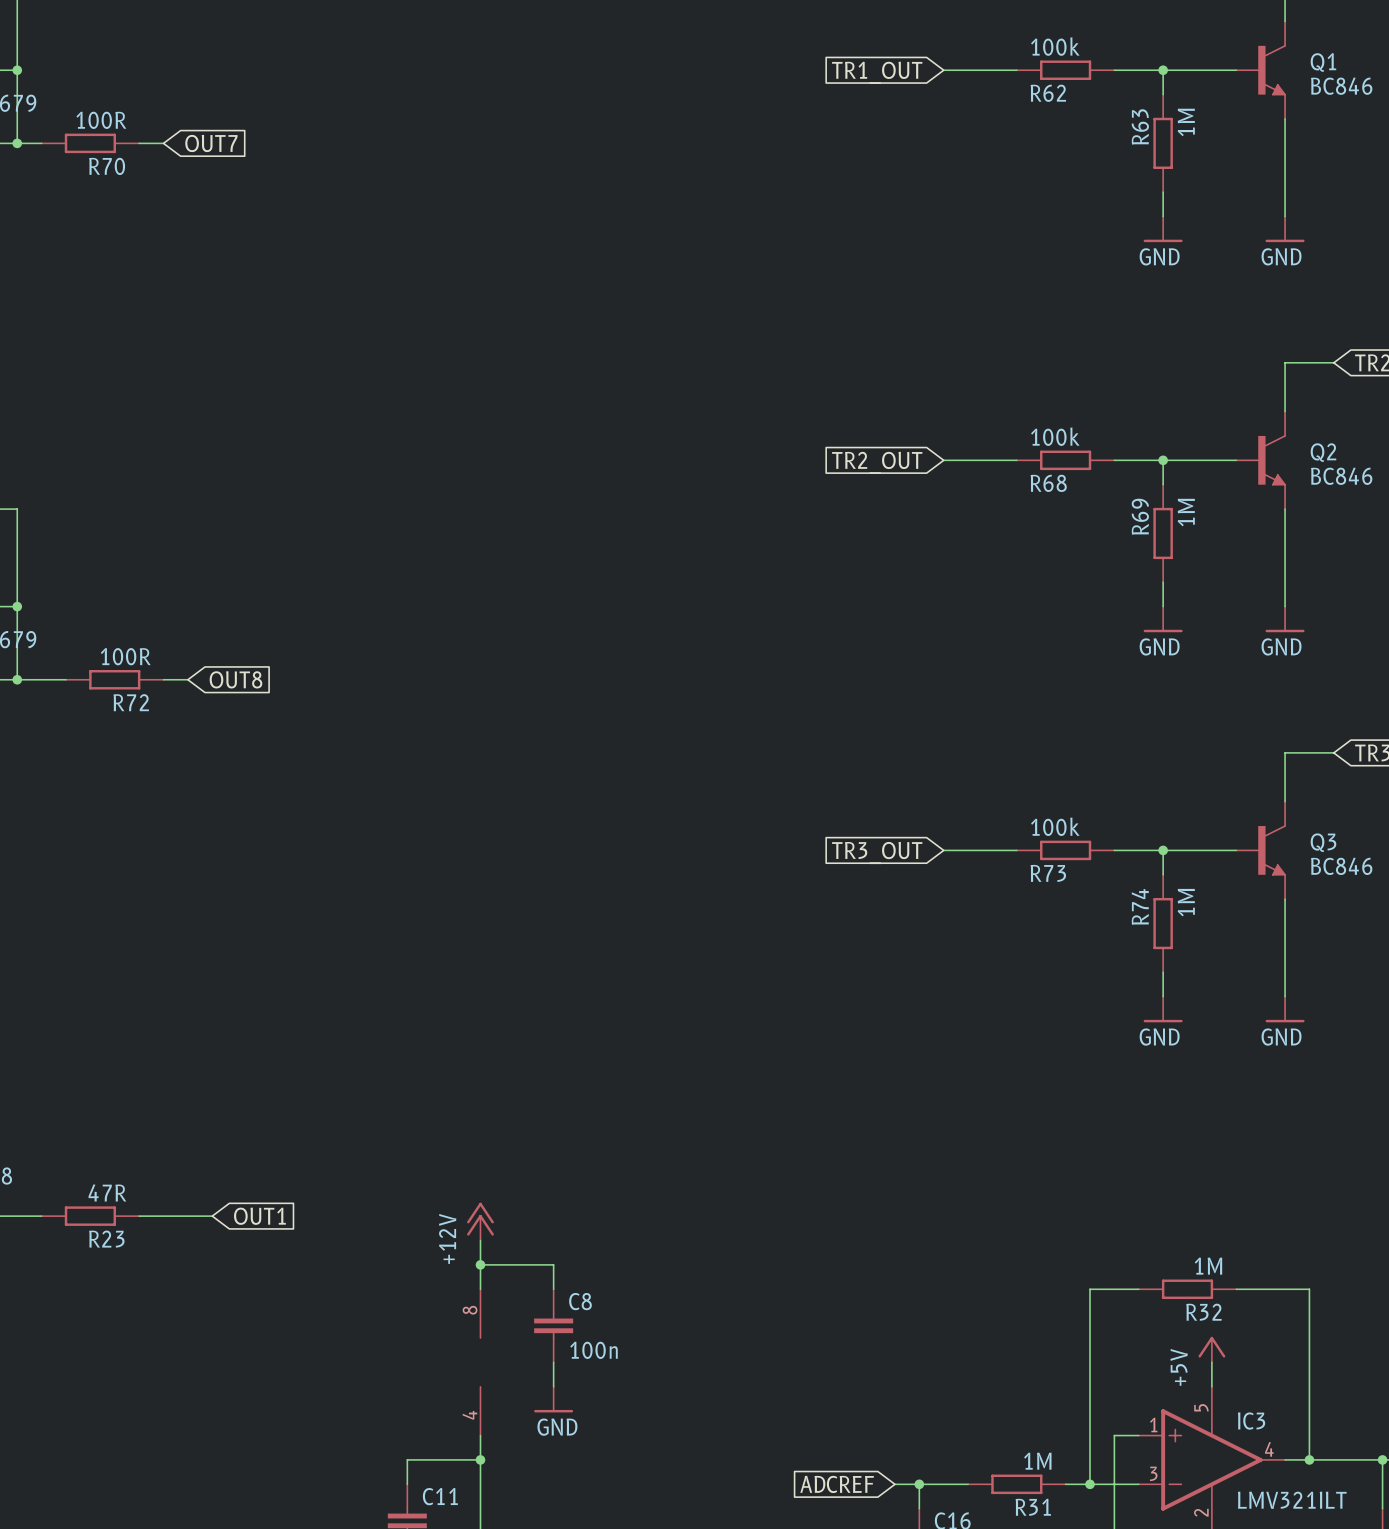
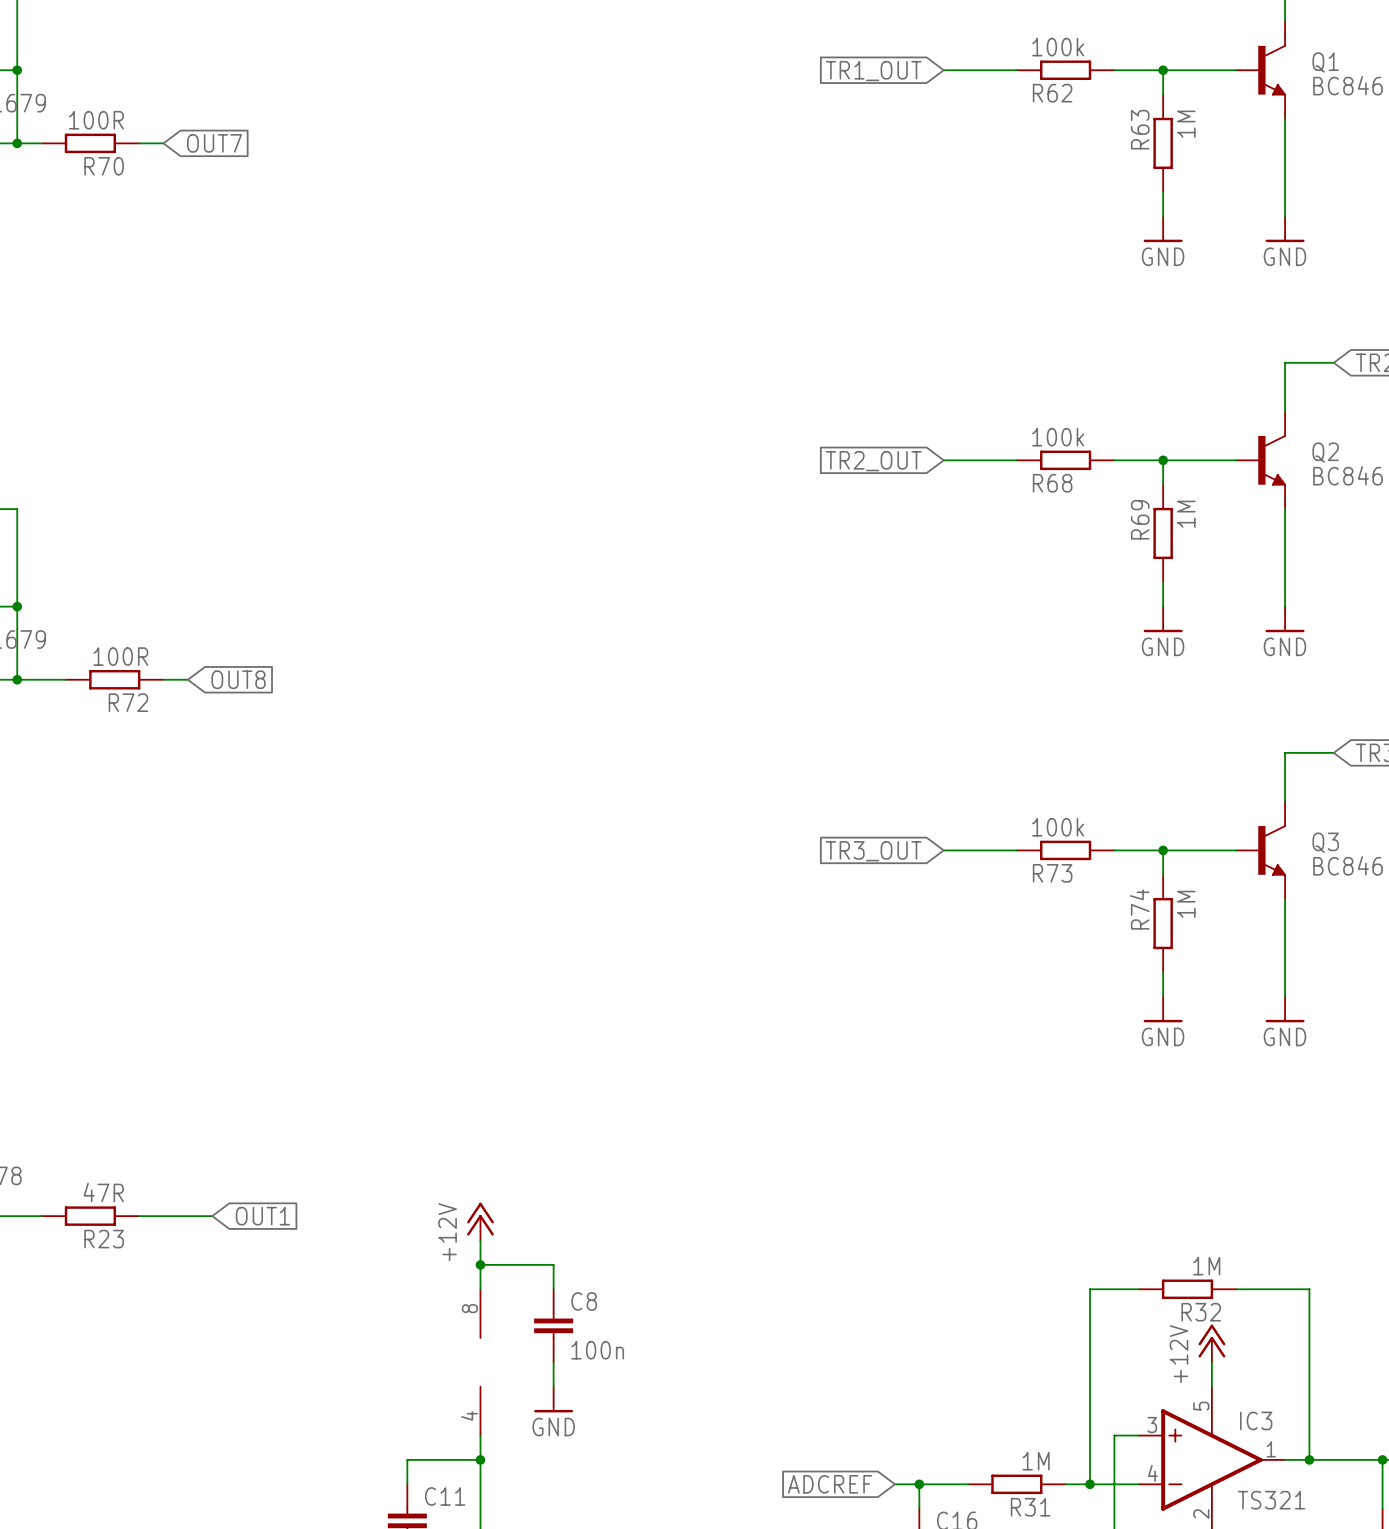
power symbol: +5V (1211, 1349) -> +12V (1211, 1343)
IC3 pin number: 1 (1153, 1425) -> 3 (1152, 1425)
IC3 pin number: 4 (1269, 1449) -> 1 (1271, 1449)
IC3 pin number: 3 (1153, 1473) -> 4 (1152, 1473)
IC3 value: LMV321ILT (1292, 1500) -> TS321 (1271, 1500)

